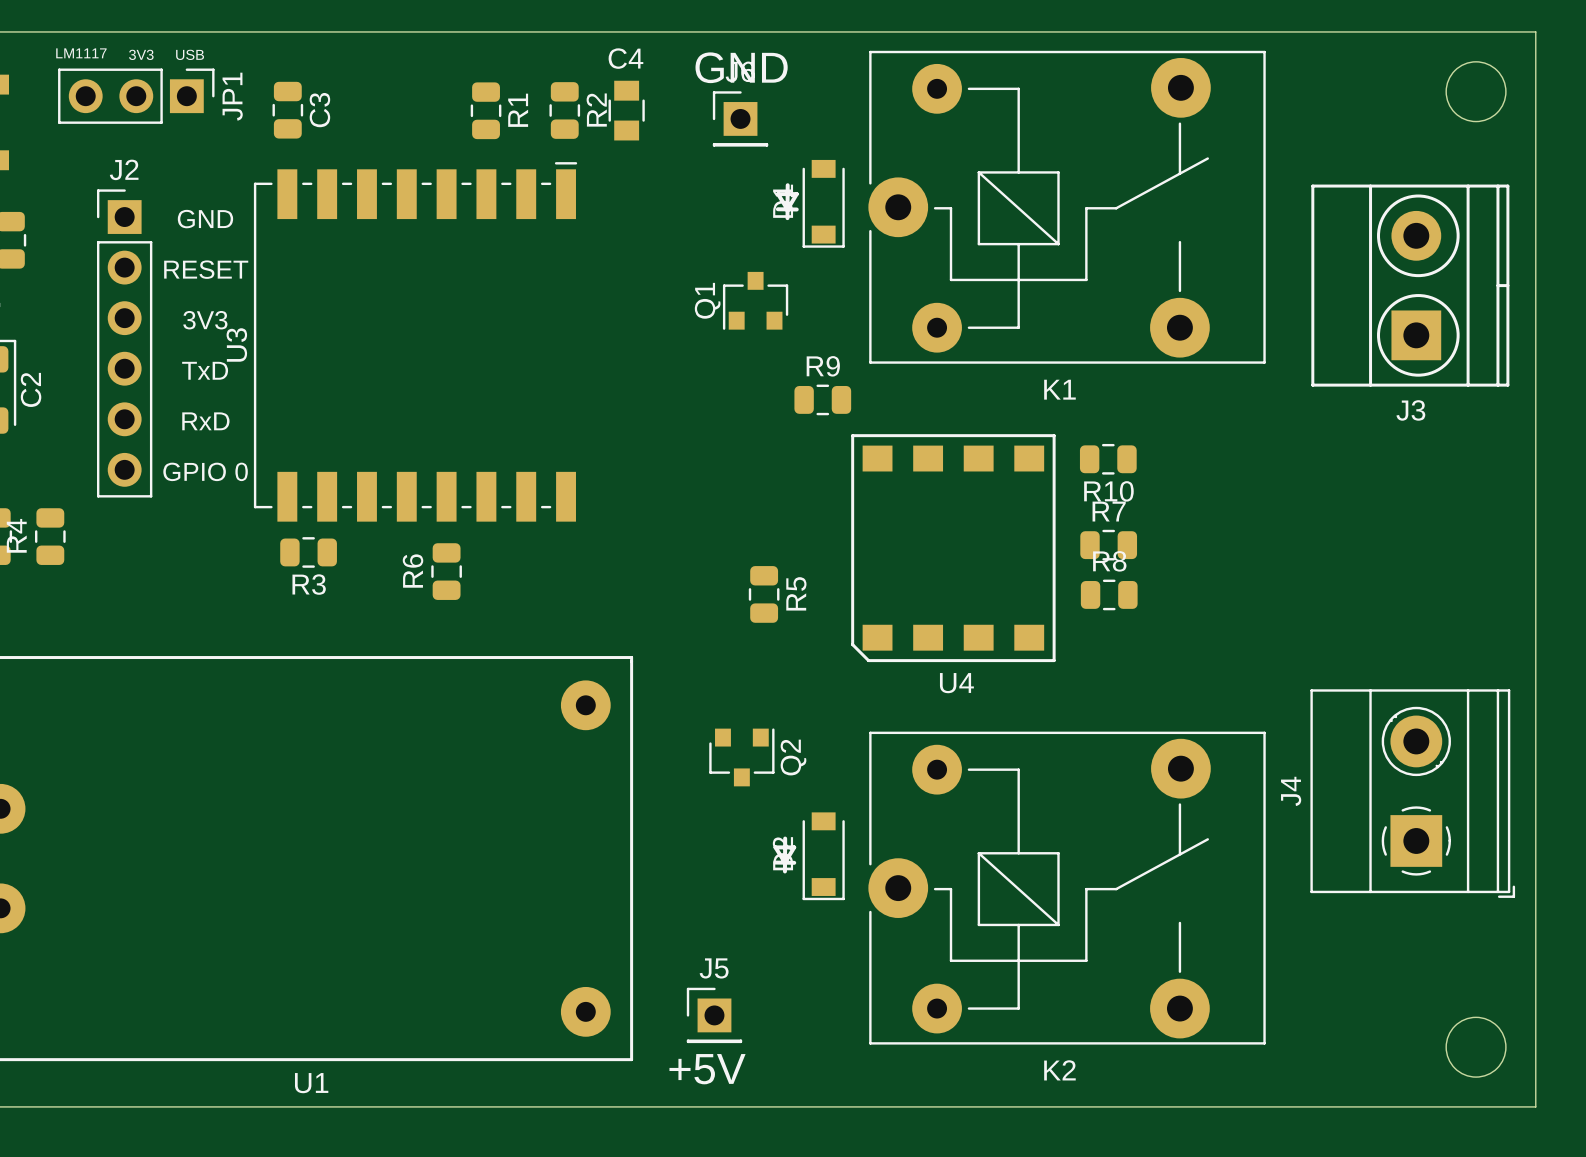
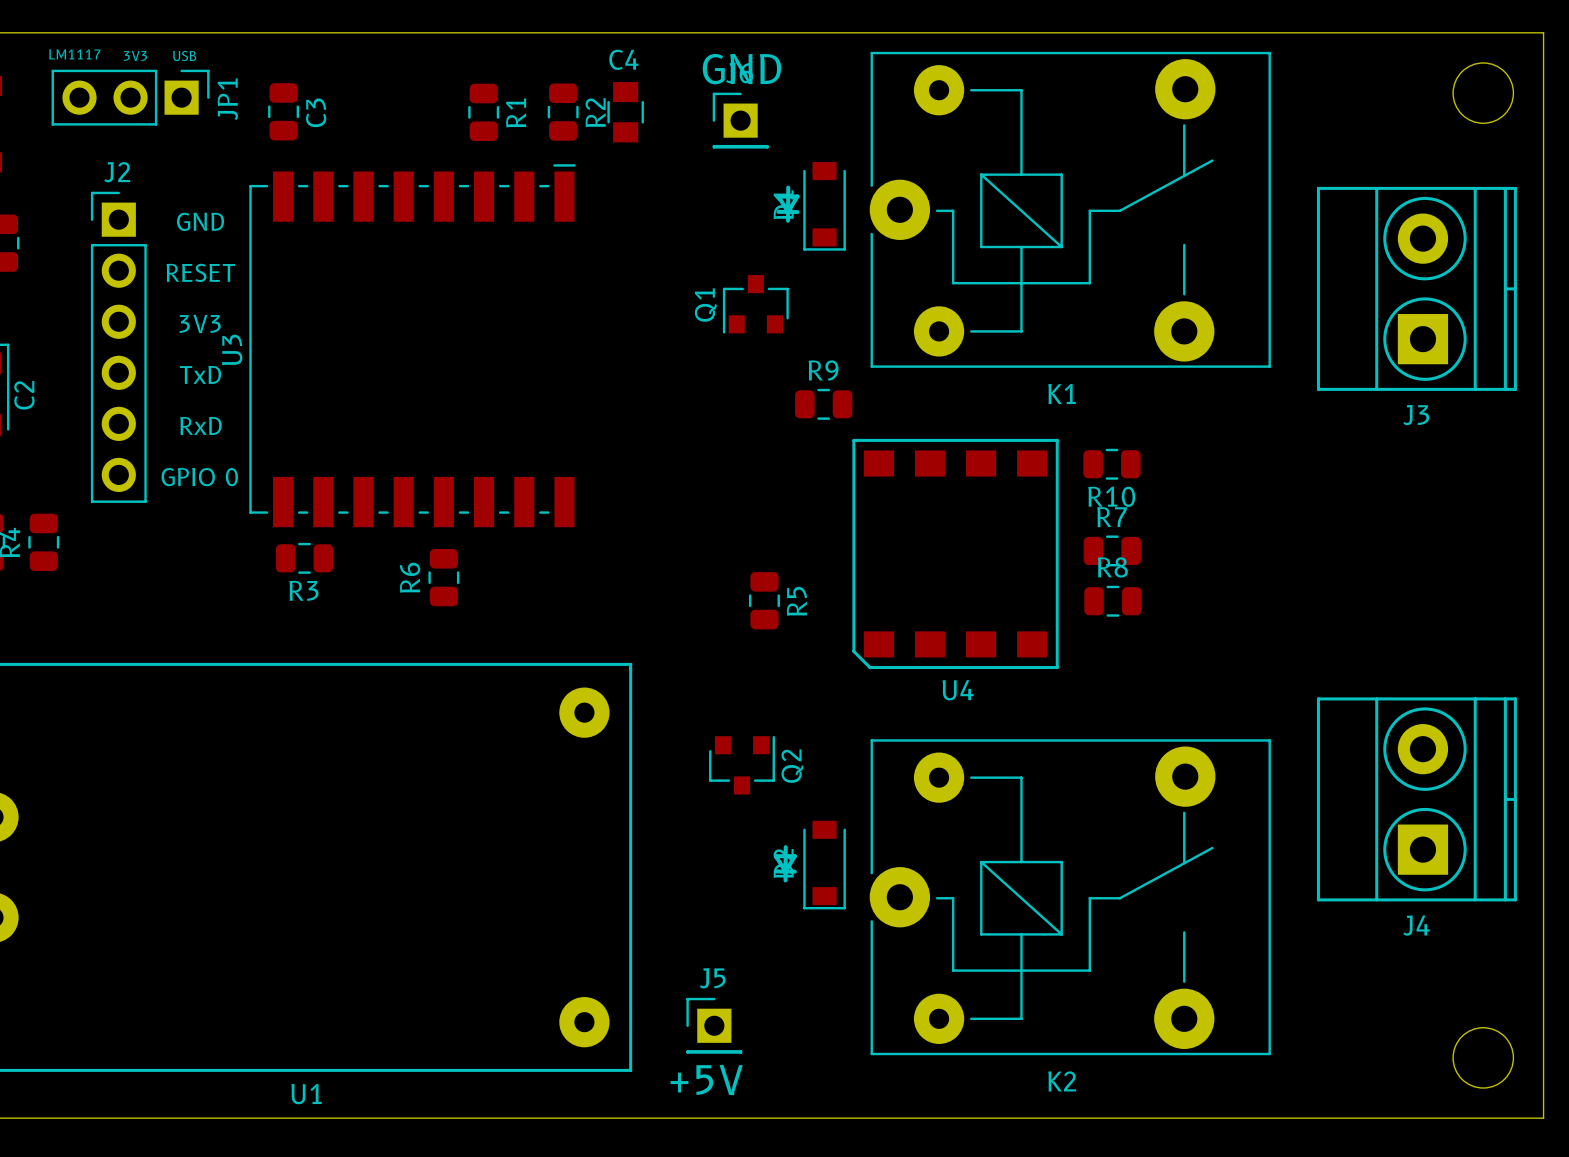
J4 footprint: [1310, 689, 1516, 898] -> [1316, 697, 1517, 902]
J4 name rotation: 0° (1291, 791) -> 90° clockwise (1416, 925)
J4 name position: J4 (1291, 791) -> J4 (1416, 925)

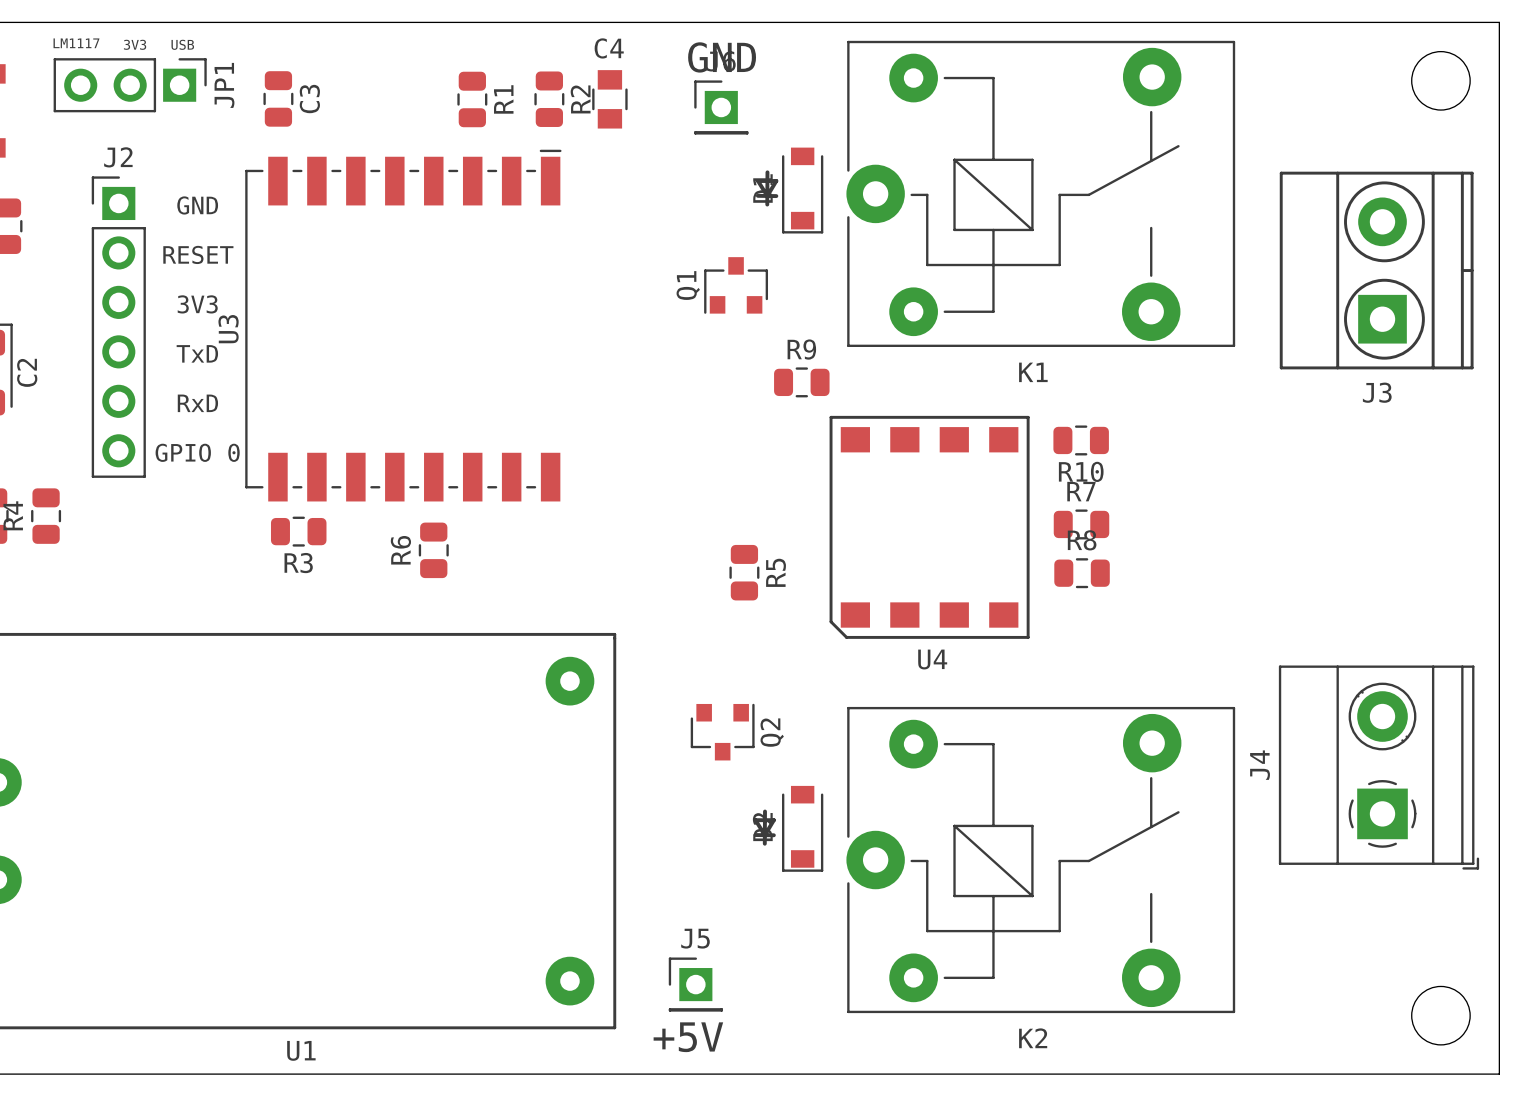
J4 footprint: [1316, 697, 1517, 902] -> [1278, 665, 1480, 870]
J4 name rotation: 0° (1416, 925) -> 90° counterclockwise (1260, 765)
J4 name position: J4 (1416, 925) -> J4 (1260, 765)

